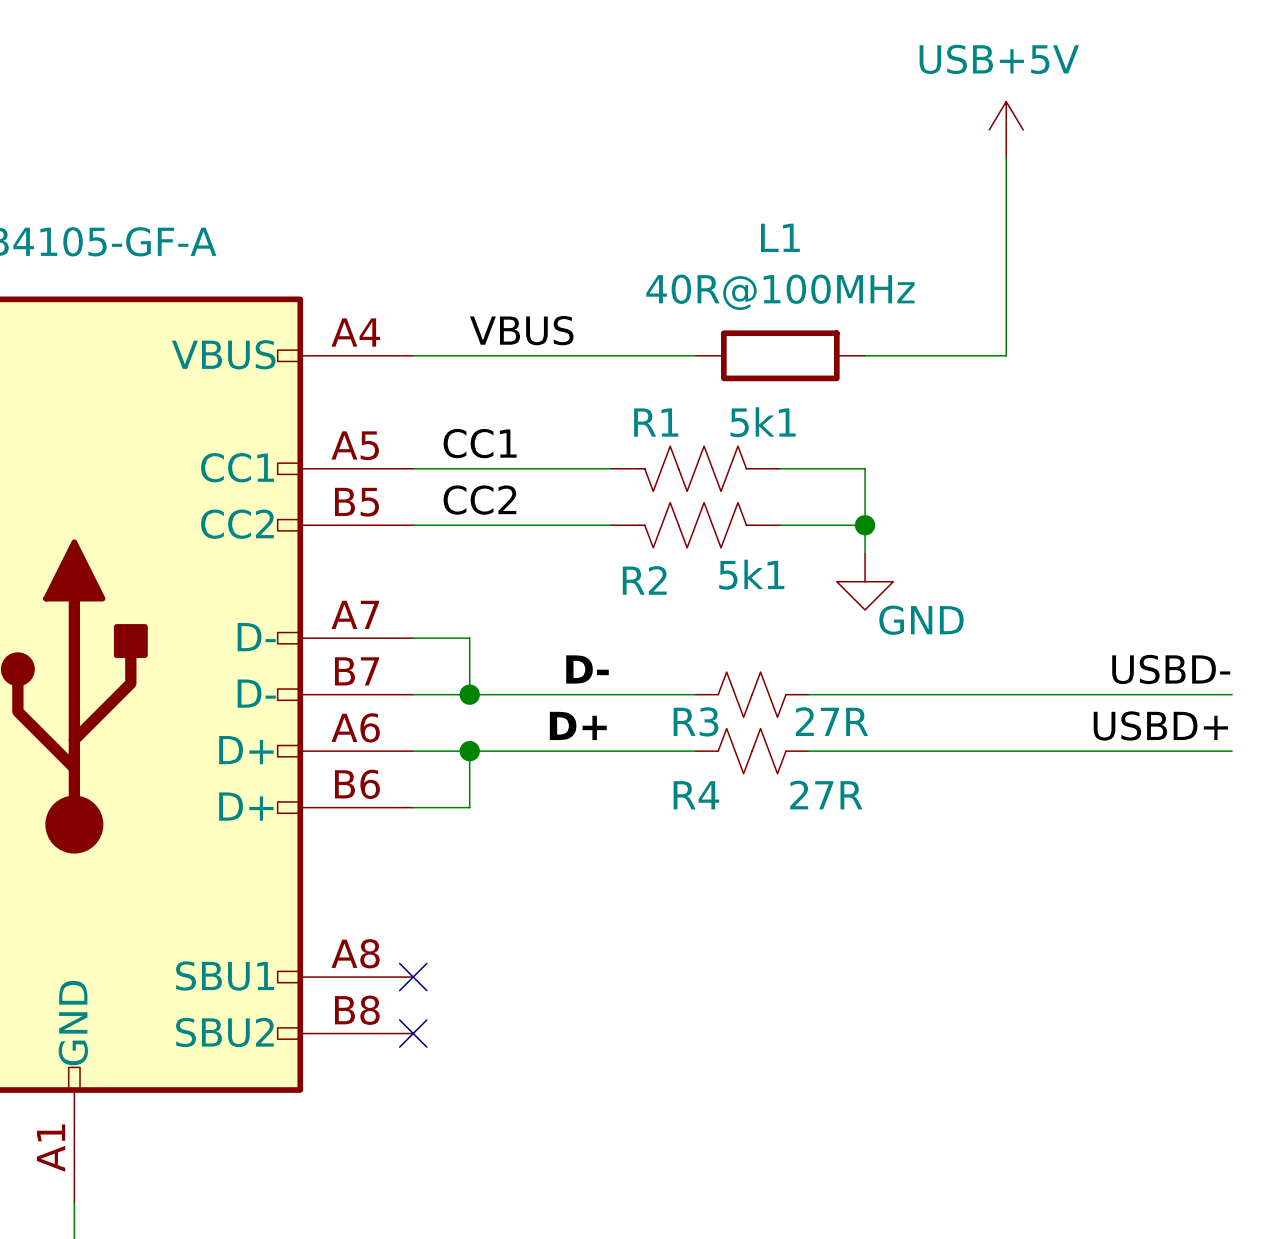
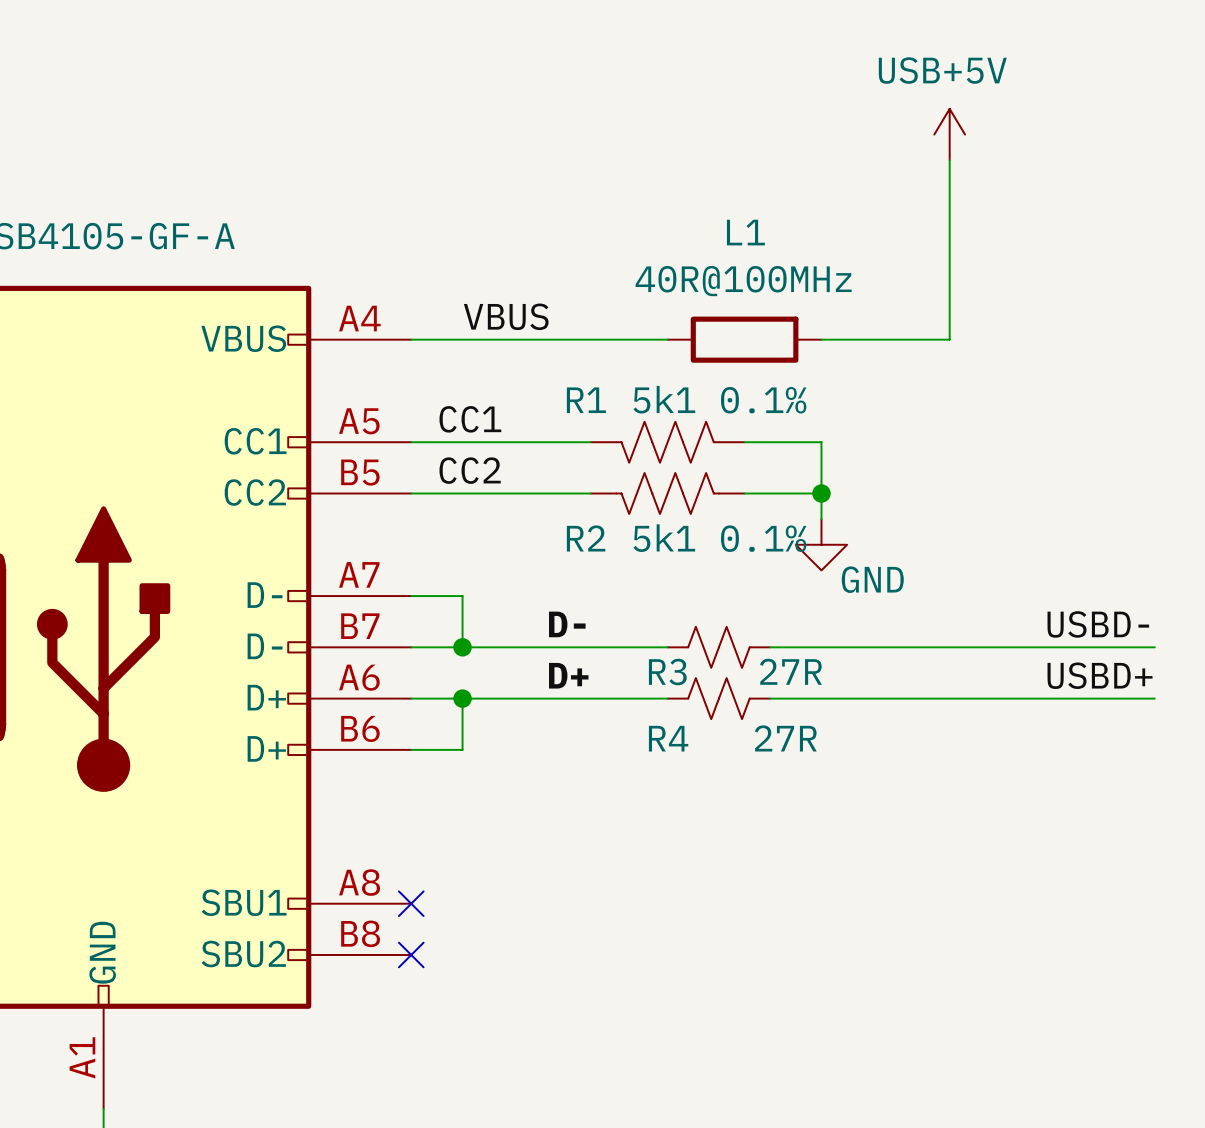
R1 name position: R1 (656, 422) -> R1 (586, 400)
R1 value: 5k1 (763, 422) -> 5k1 0.1% (719, 399)
R2 value: 5k1 (751, 574) -> 5k1 0.1% (719, 538)
R2 name position: R2 (644, 580) -> R2 (586, 538)

